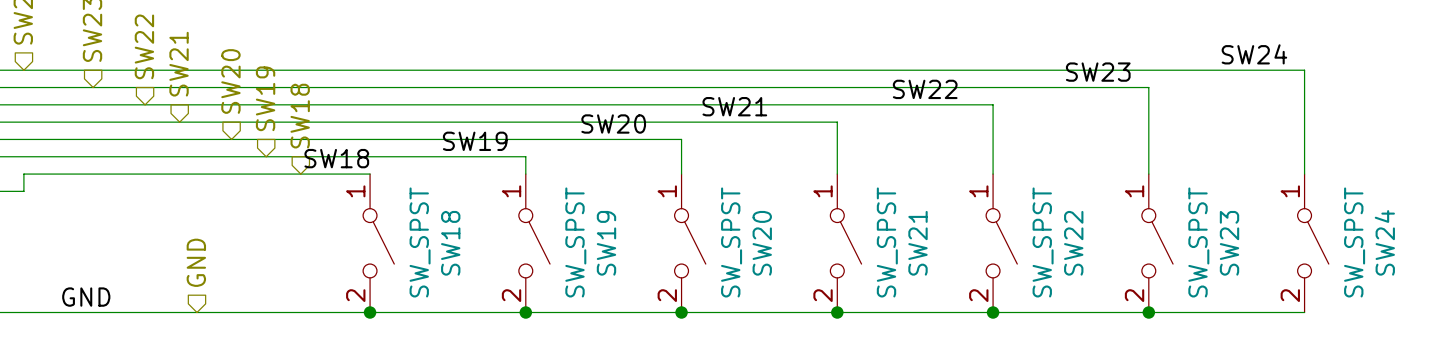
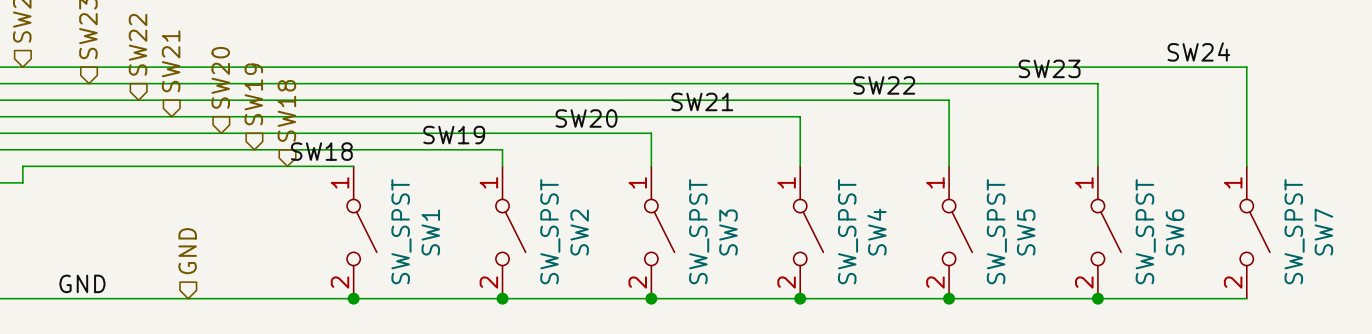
SW24 name: SW24 (1384, 242) -> SW7 (1323, 232)
SW18 name: SW18 (450, 243) -> SW1 (430, 232)
SW19 name: SW19 (606, 243) -> SW2 (579, 232)
SW20 name: SW20 (762, 243) -> SW3 (728, 232)
SW21 name: SW21 (918, 243) -> SW4 (876, 232)
SW22 name: SW22 (1073, 243) -> SW5 (1026, 232)
SW23 name: SW23 (1229, 243) -> SW6 (1175, 232)

